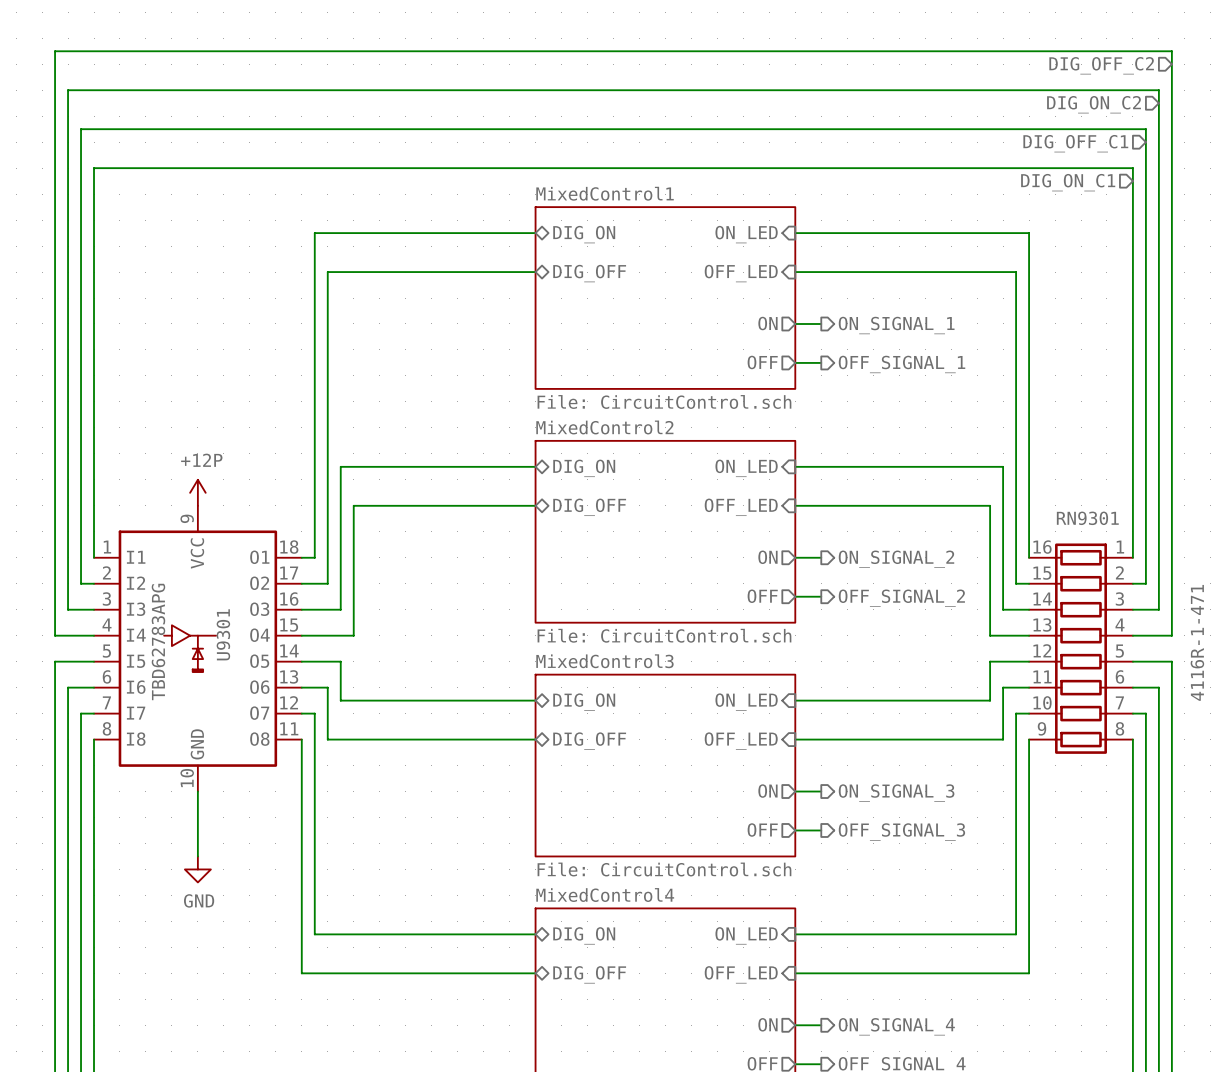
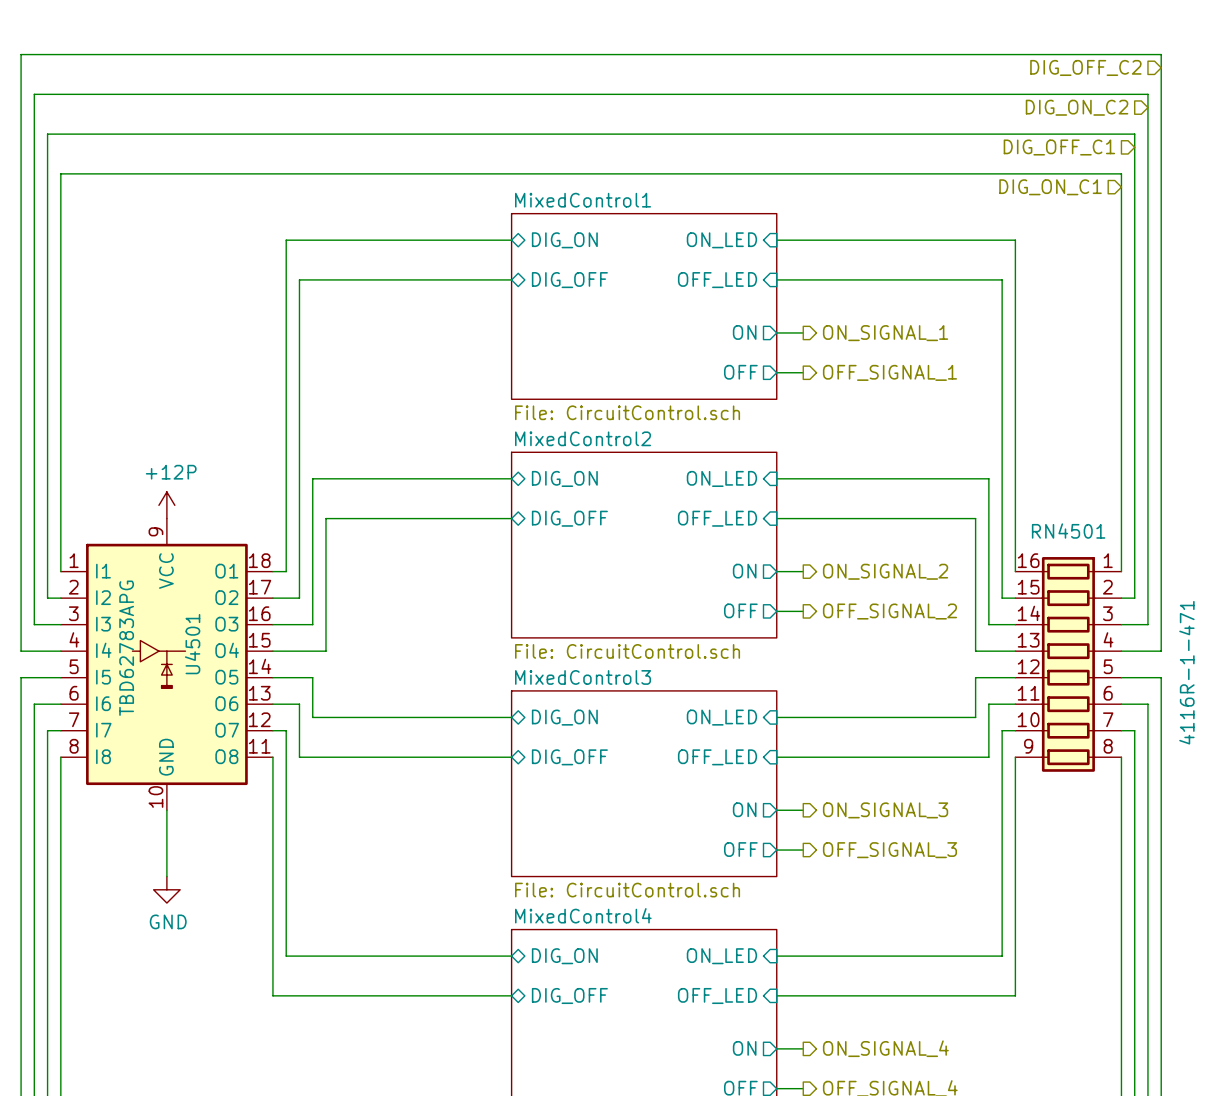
RN9301 name: RN9301 (1087, 518) -> RN4501 (1068, 531)
U9301 name: U9301 (223, 634) -> U4501 (192, 644)

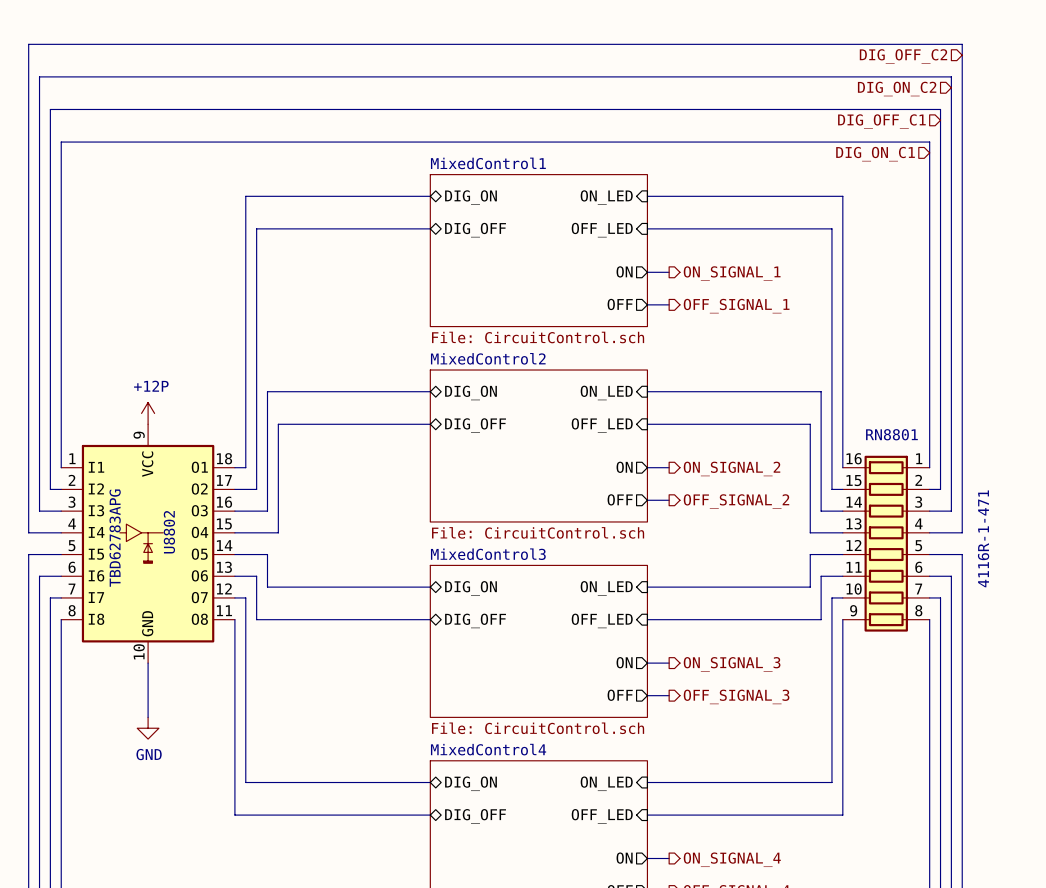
RN4501 name: RN4501 (1068, 531) -> RN8801 (891, 434)
U4501 name: U4501 (192, 644) -> U8802 (169, 532)

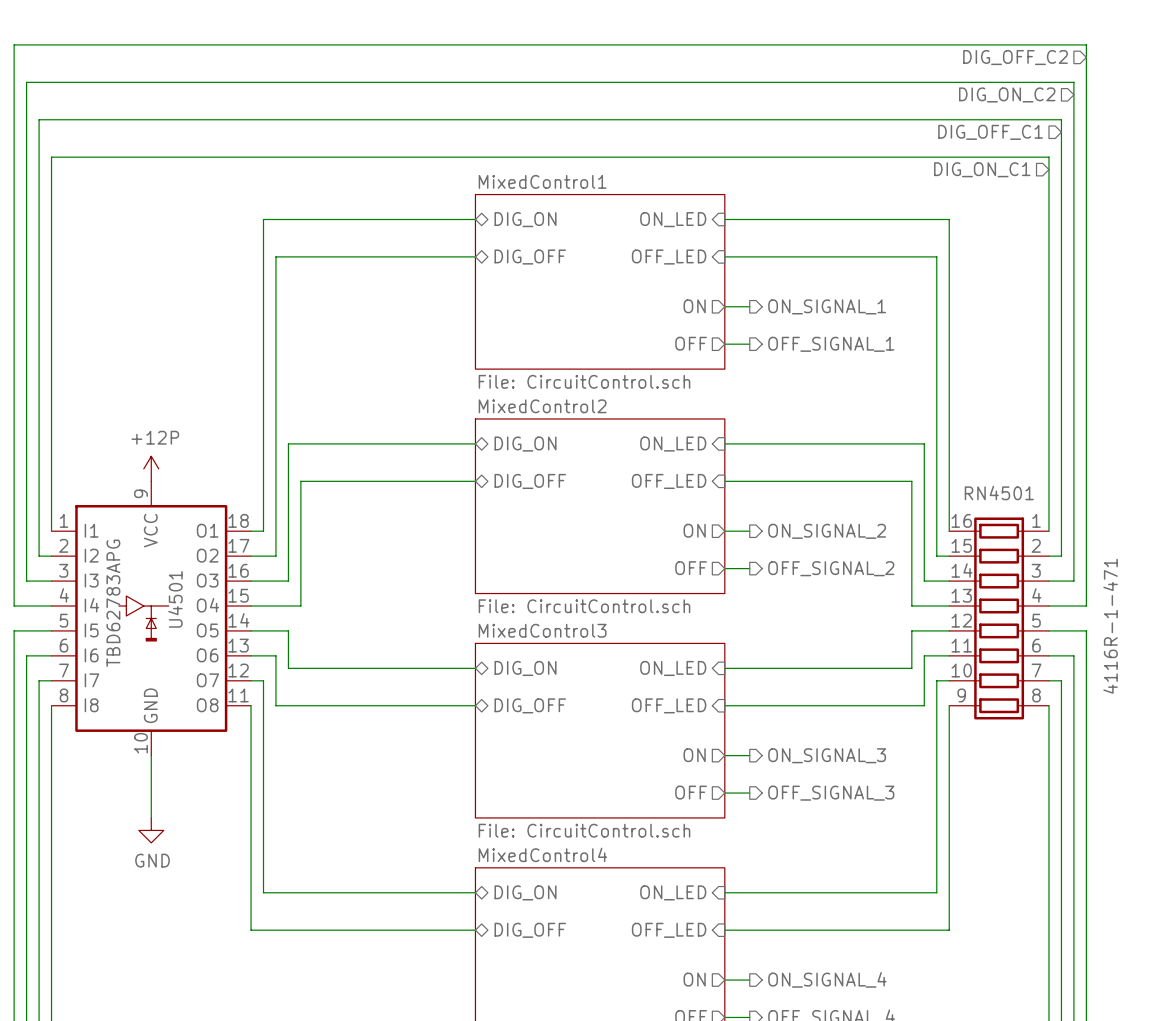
RN8801 name: RN8801 (891, 434) -> RN4501 (999, 493)
U8802 name: U8802 (169, 532) -> U4501 (175, 599)

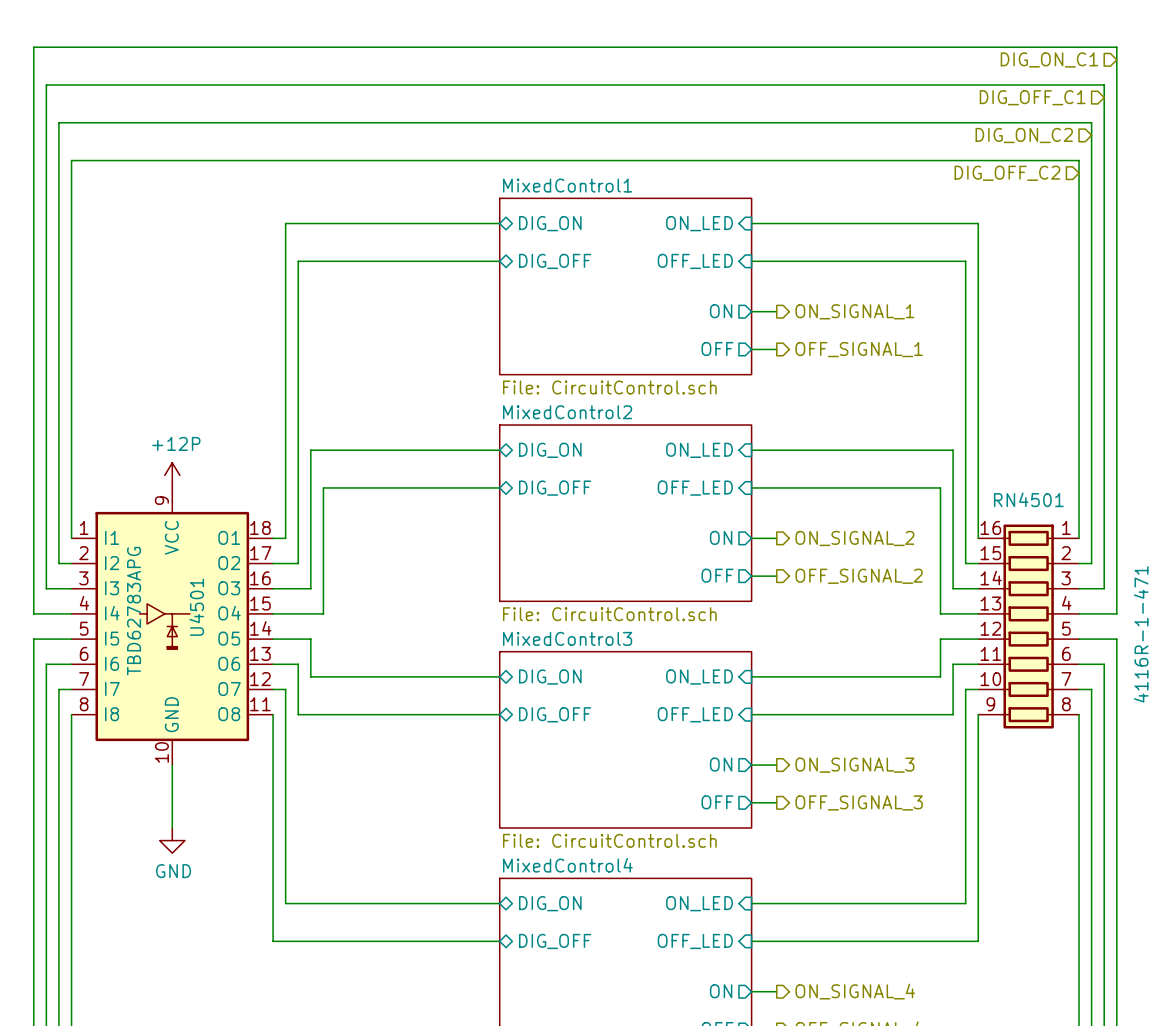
hierarchical label: DIG_OFF_C2 (1015, 57) -> DIG_ON_C1 (1049, 59)
hierarchical label: DIG_ON_C2 (1007, 94) -> DIG_OFF_C1 (1032, 97)
hierarchical label: DIG_OFF_C1 (990, 132) -> DIG_ON_C2 (1024, 135)
hierarchical label: DIG_ON_C1 (982, 169) -> DIG_OFF_C2 (1007, 173)

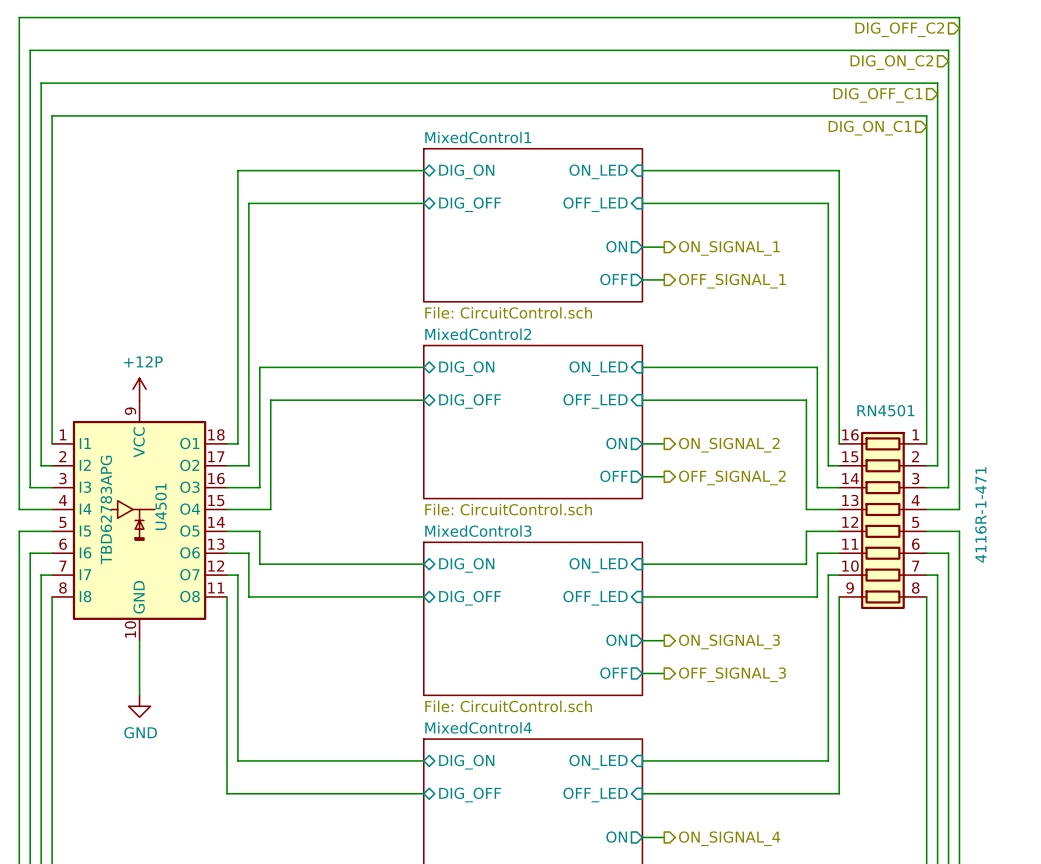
hierarchical label: DIG_ON_C1 (1049, 59) -> DIG_OFF_C2 (899, 29)
hierarchical label: DIG_OFF_C1 (1032, 97) -> DIG_ON_C2 (891, 62)
hierarchical label: DIG_ON_C2 (1024, 135) -> DIG_OFF_C1 (877, 95)
hierarchical label: DIG_OFF_C2 (1007, 173) -> DIG_ON_C1 (870, 128)

